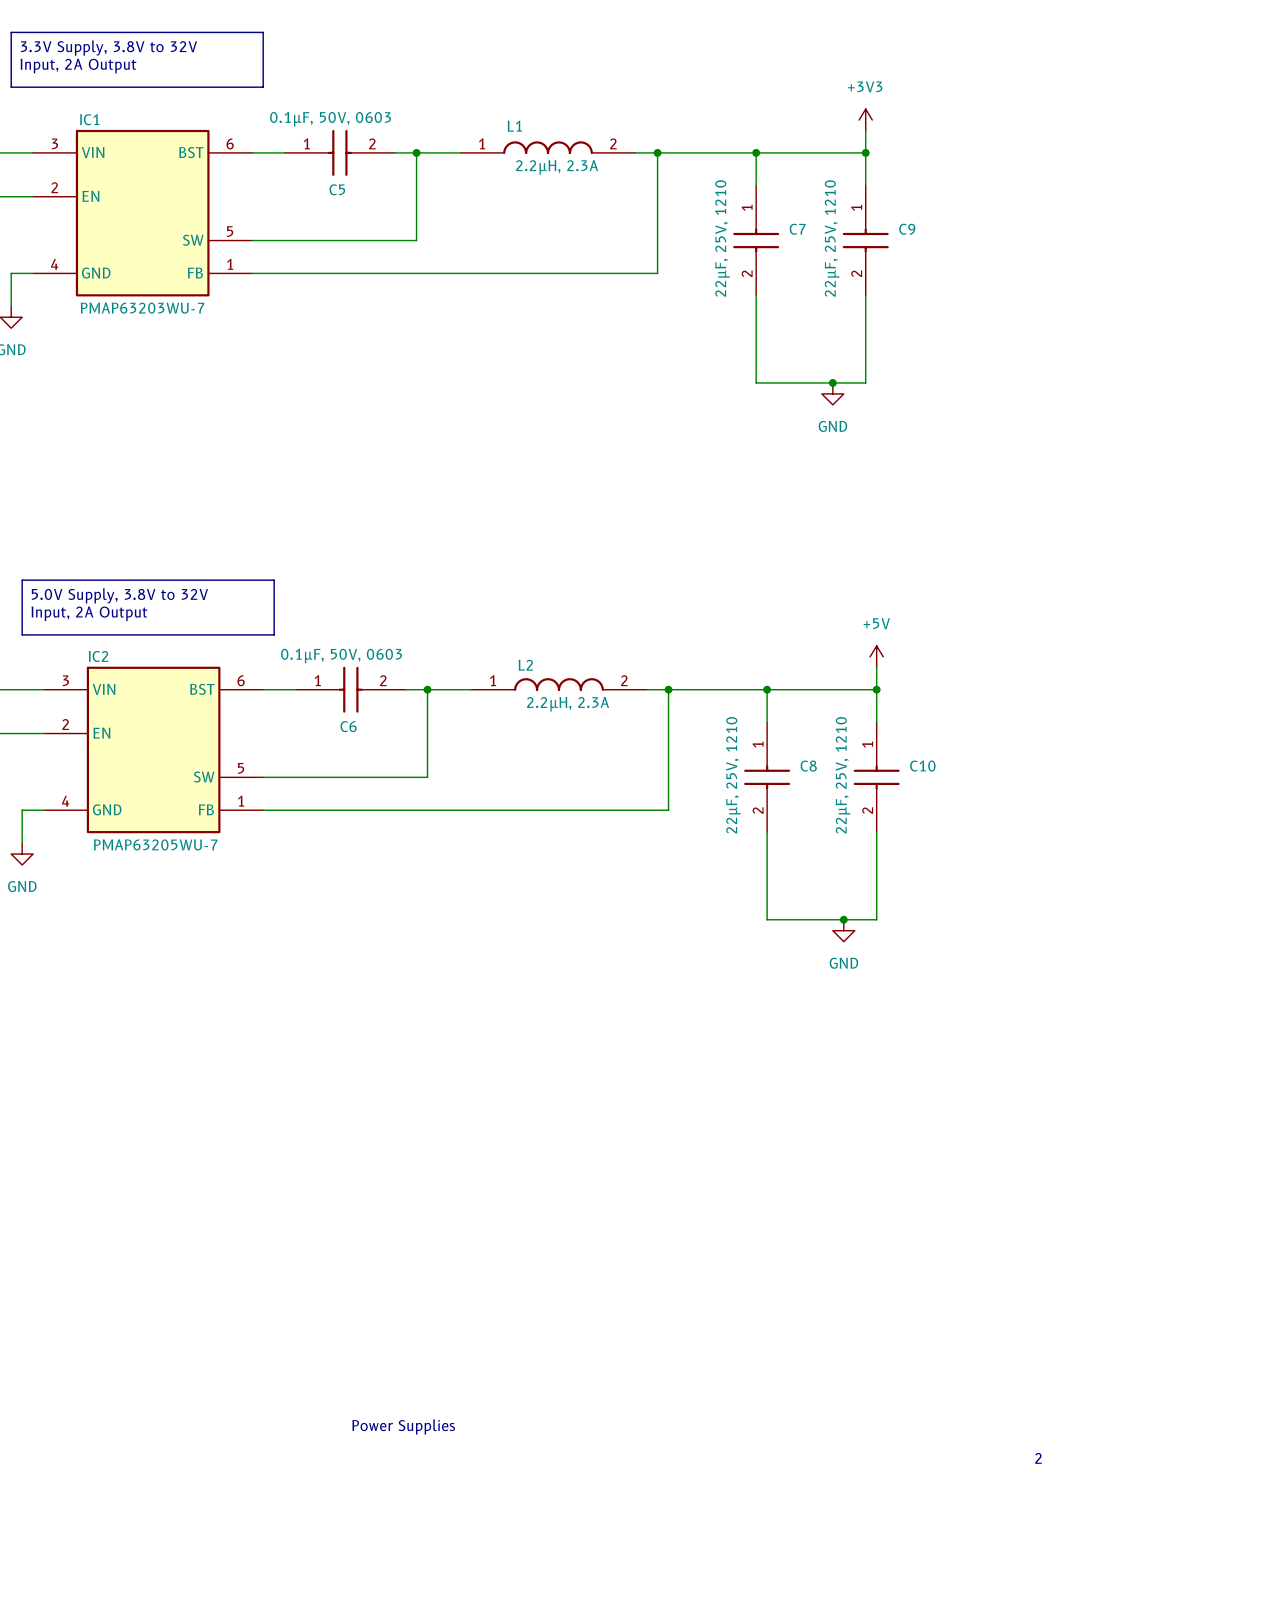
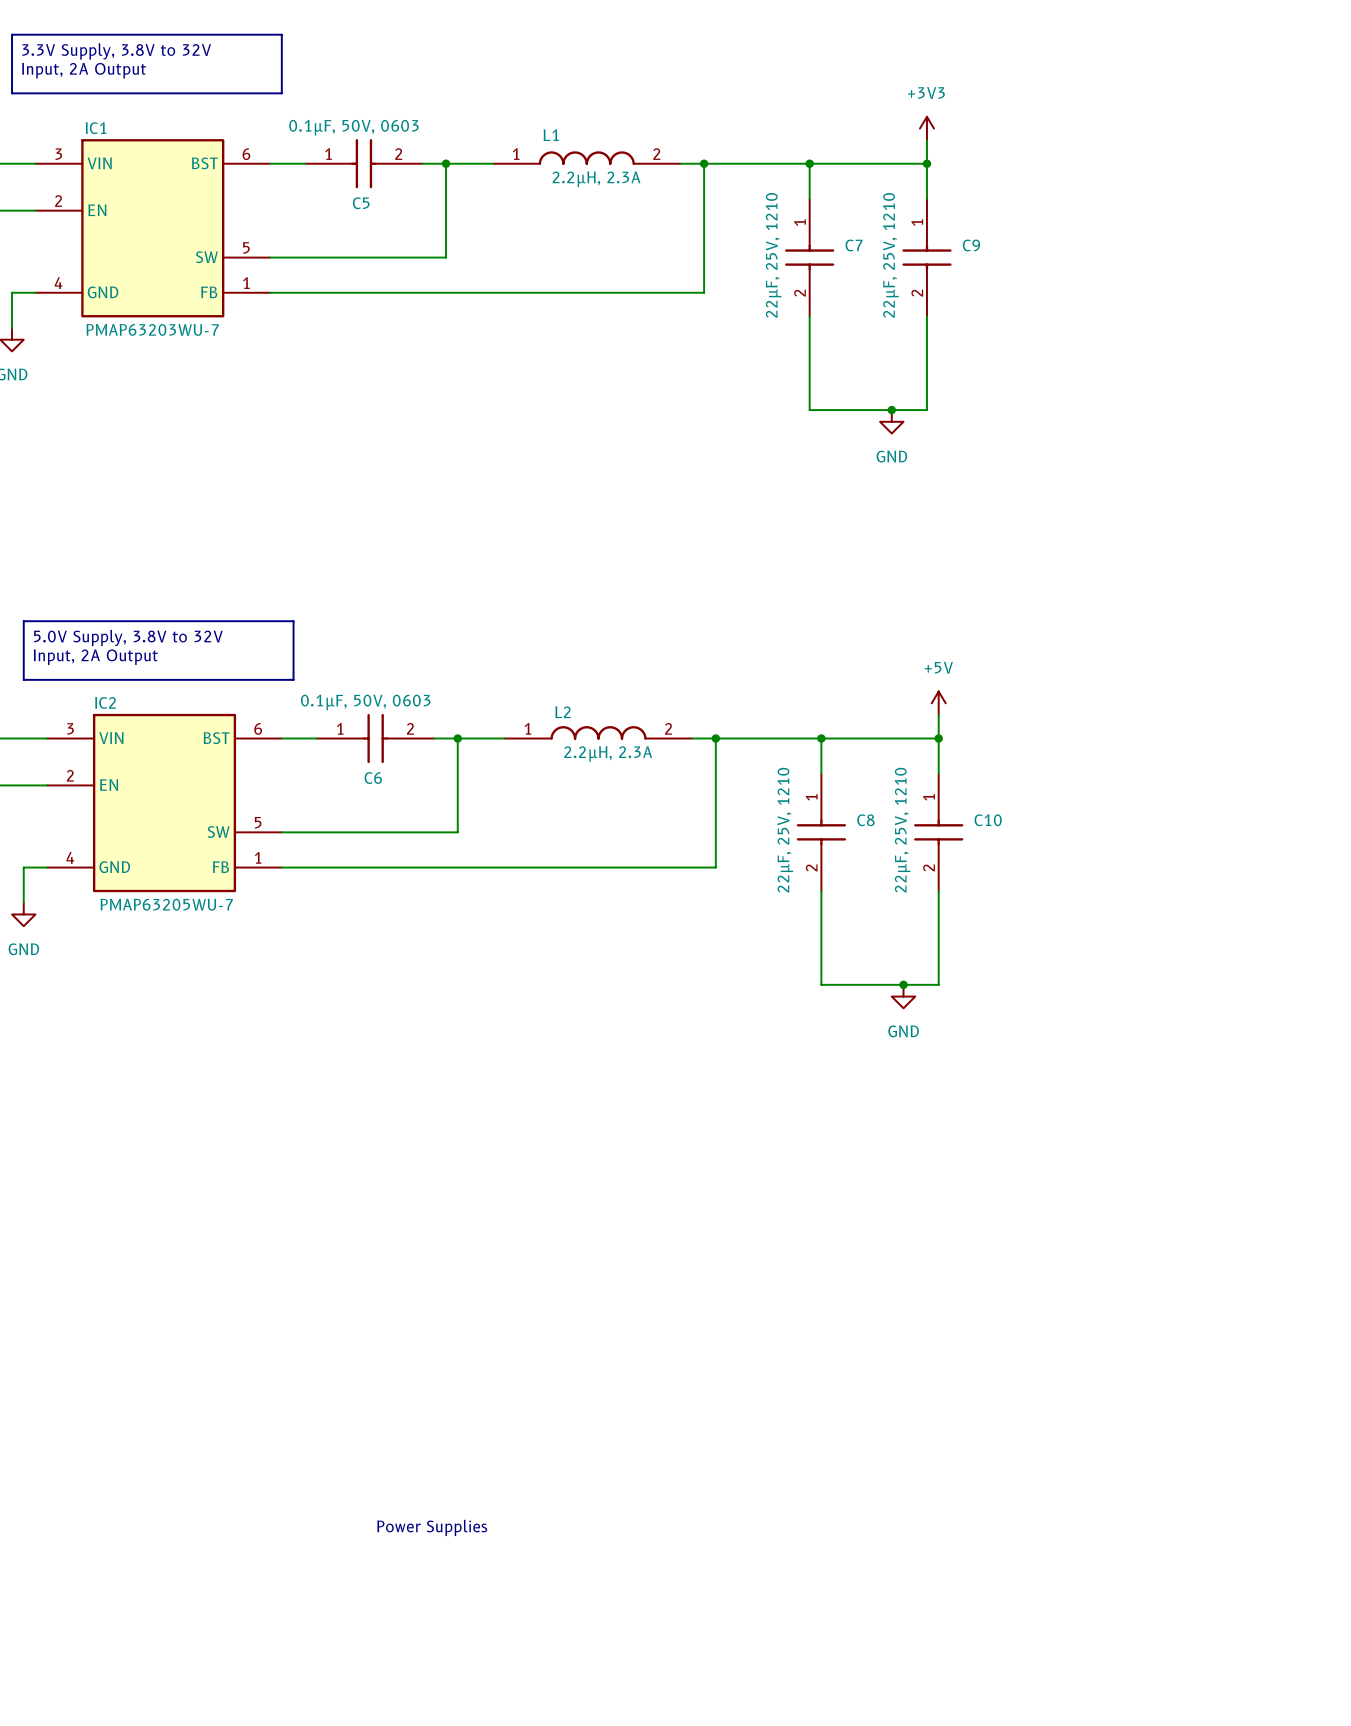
text: 2 (1038, 1458) -> none

